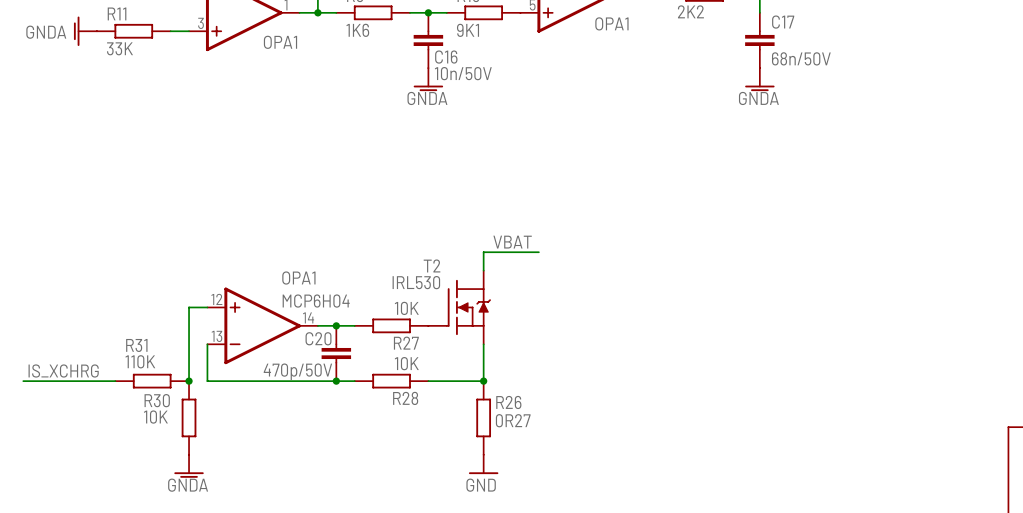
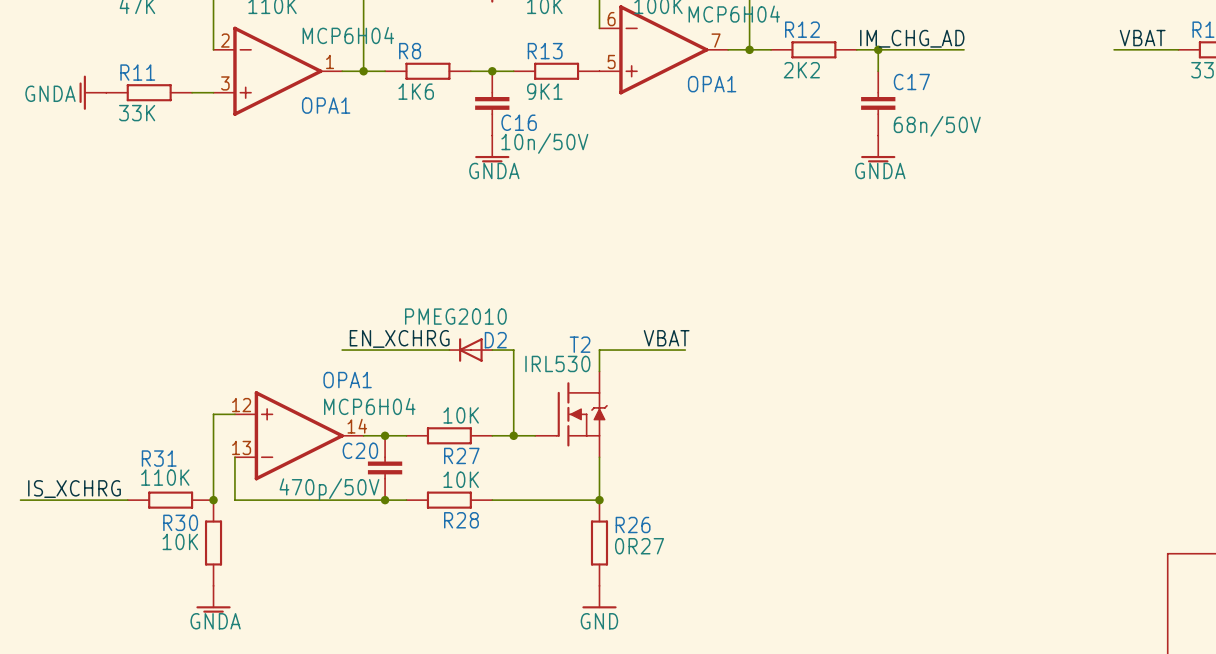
label: none -> EN_XCHRG (399, 338)
label position: VBAT (512, 242) -> VBAT (666, 338)
wire: none -> (342, 350) (449, 350)
D2: none -> PMEG2010 (470, 350)
wire: none -> (492, 350) (513, 350) (513, 435)
wire: (520, 252) (483, 252) (483, 270) -> (599, 350) (599, 371)
wire: none -> (620, 350) (685, 350)
T2 name position: T2 (432, 265) -> T2 (580, 344)
T2 value position: IRL530 (416, 282) -> IRL530 (557, 363)
T2 position: (459, 307) -> (571, 414)
junction: none -> (513, 435)
wire: (483, 344) (483, 381) -> (599, 457) (599, 500) (556, 500)
junction: (483, 381) -> none
junction: none -> (599, 500)
R26 position: (483, 417) -> (599, 543)
power symbol position: GND (483, 464) -> GND (599, 597)

